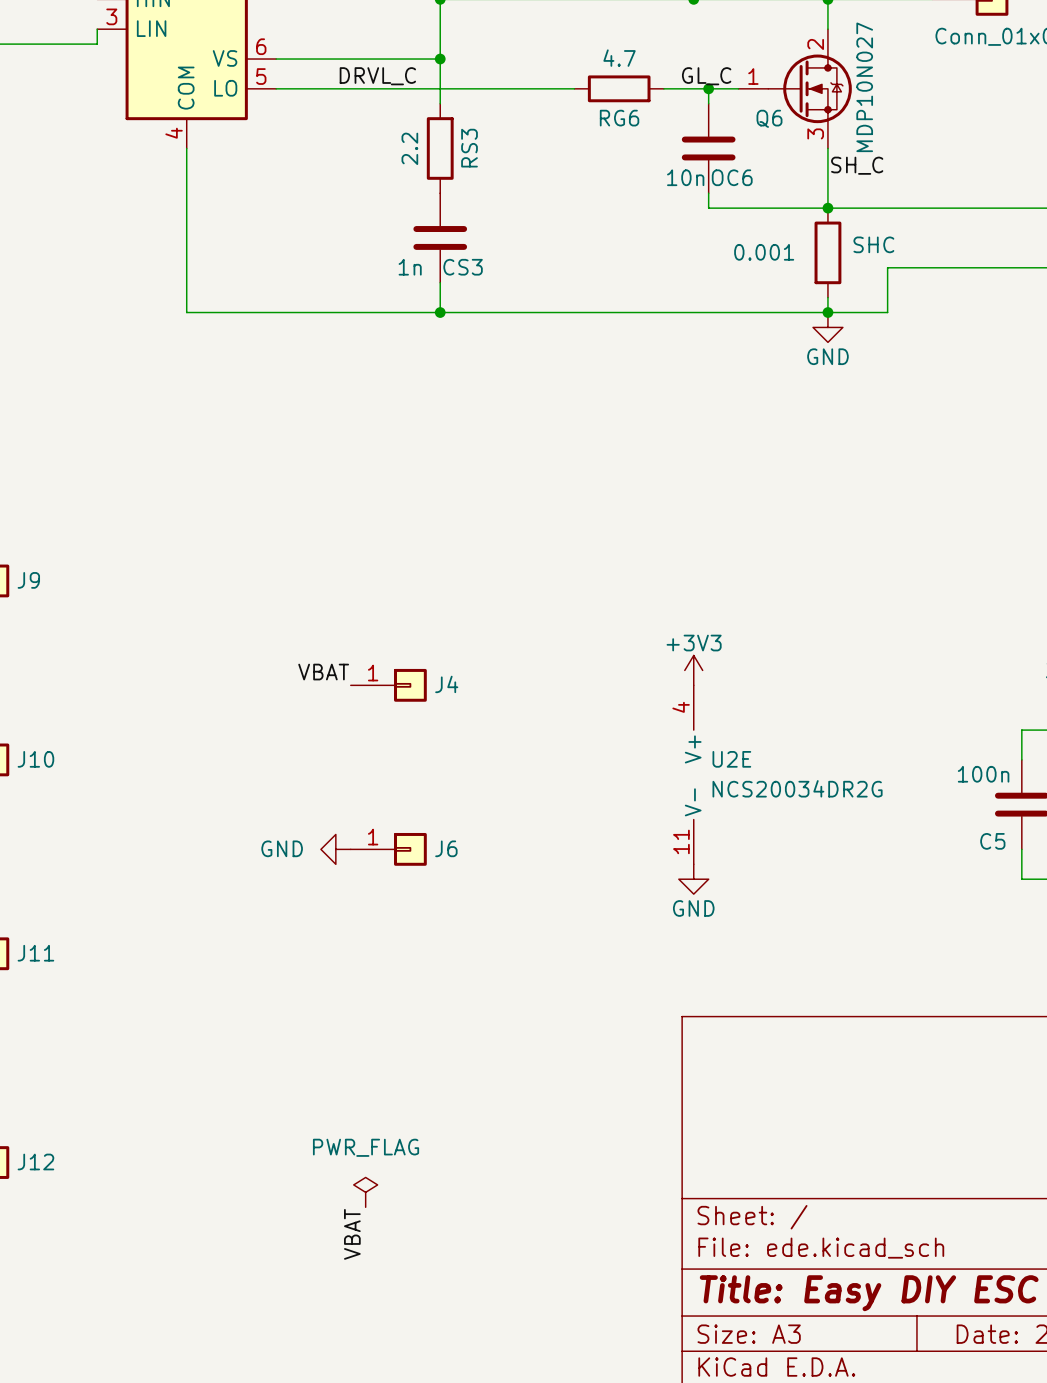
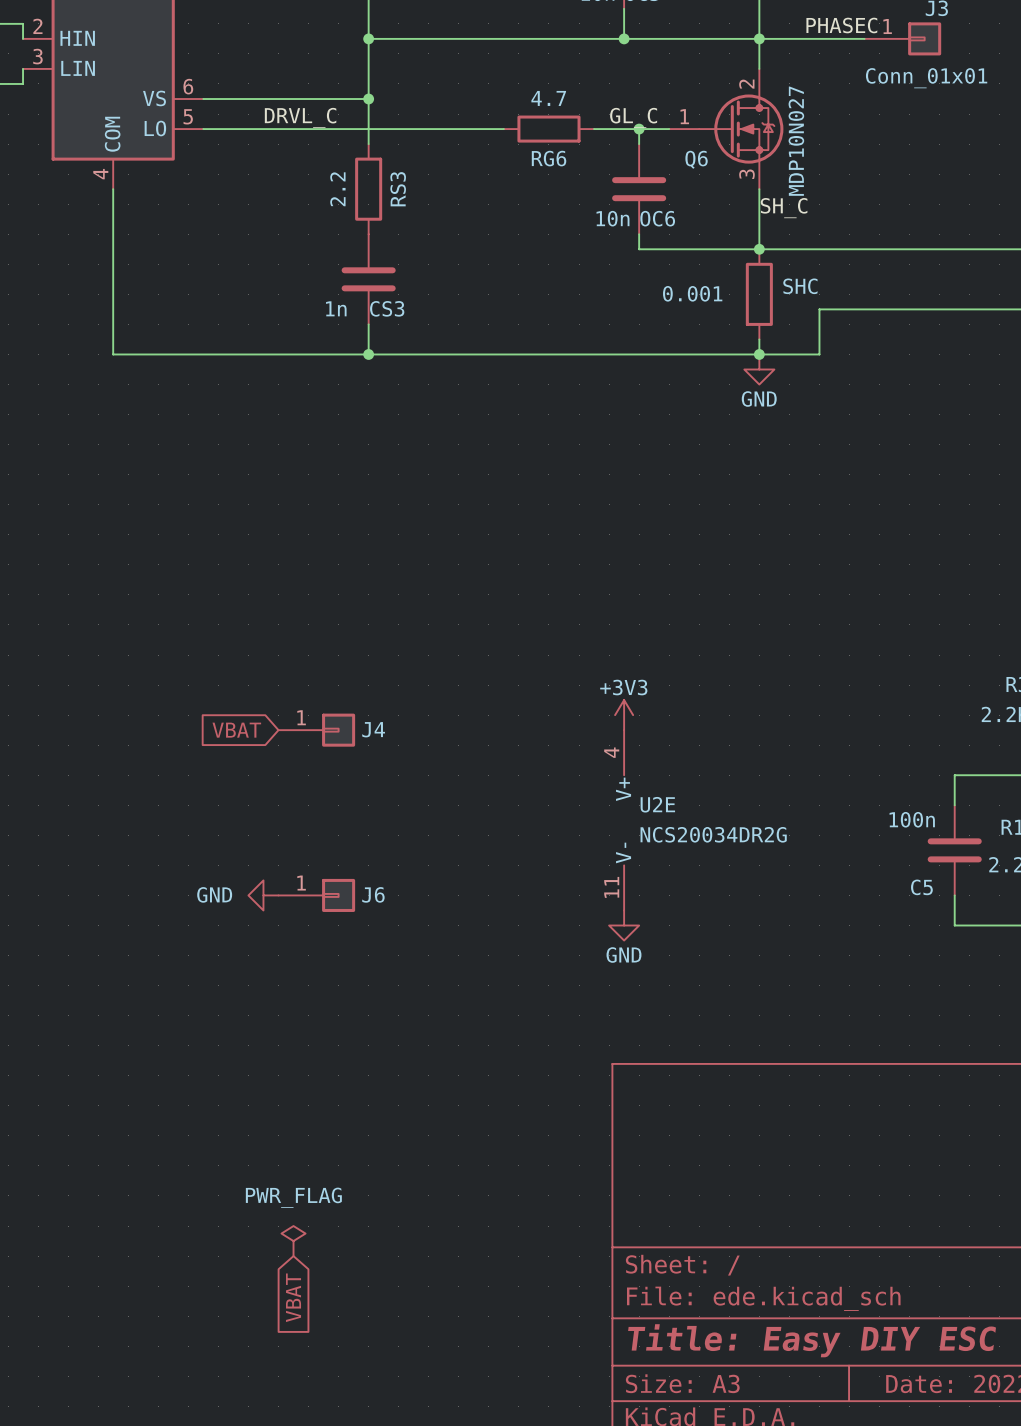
label: VBAT (323, 672) -> none
global label: none -> VBAT (236, 730)
label: VBAT (352, 1234) -> none
global label: none -> VBAT (293, 1297)

